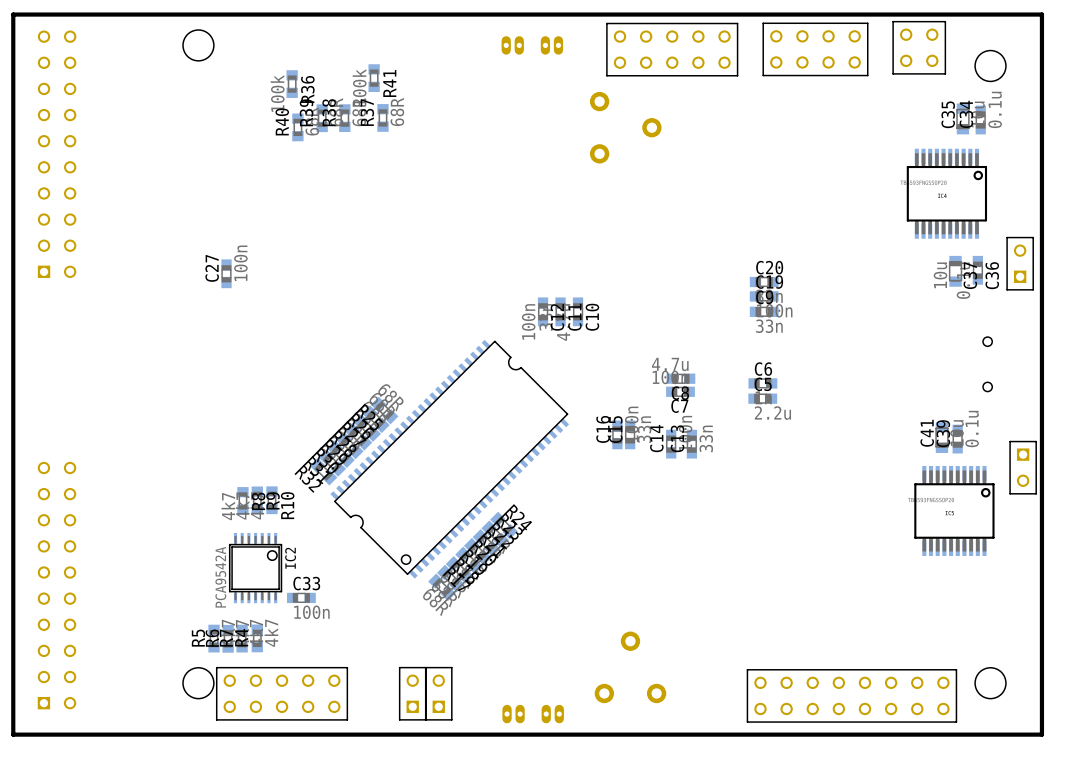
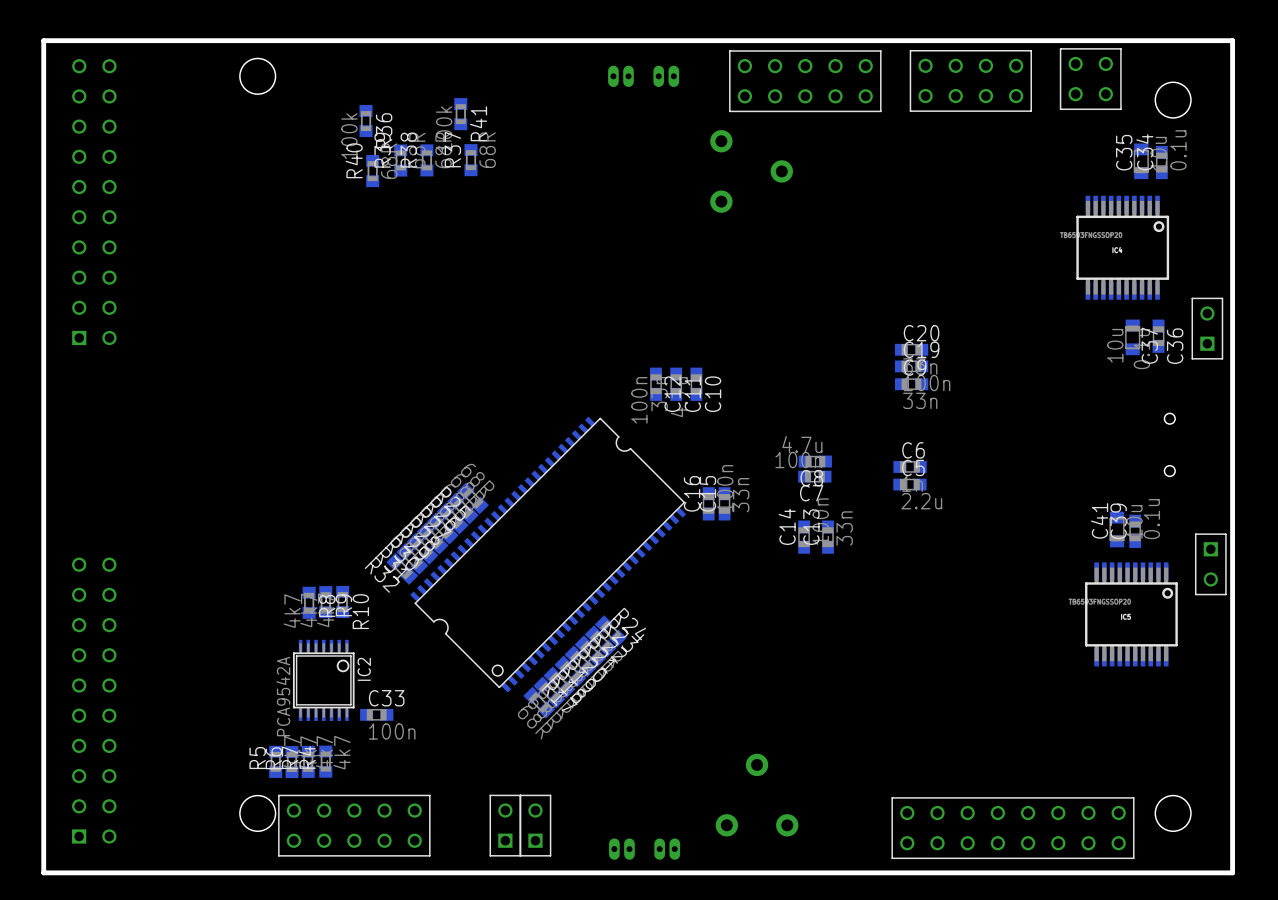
C27: 100n (226, 273) -> none
C16 position: (617, 434) -> (708, 503)
C15 position: (630, 434) -> (724, 503)

